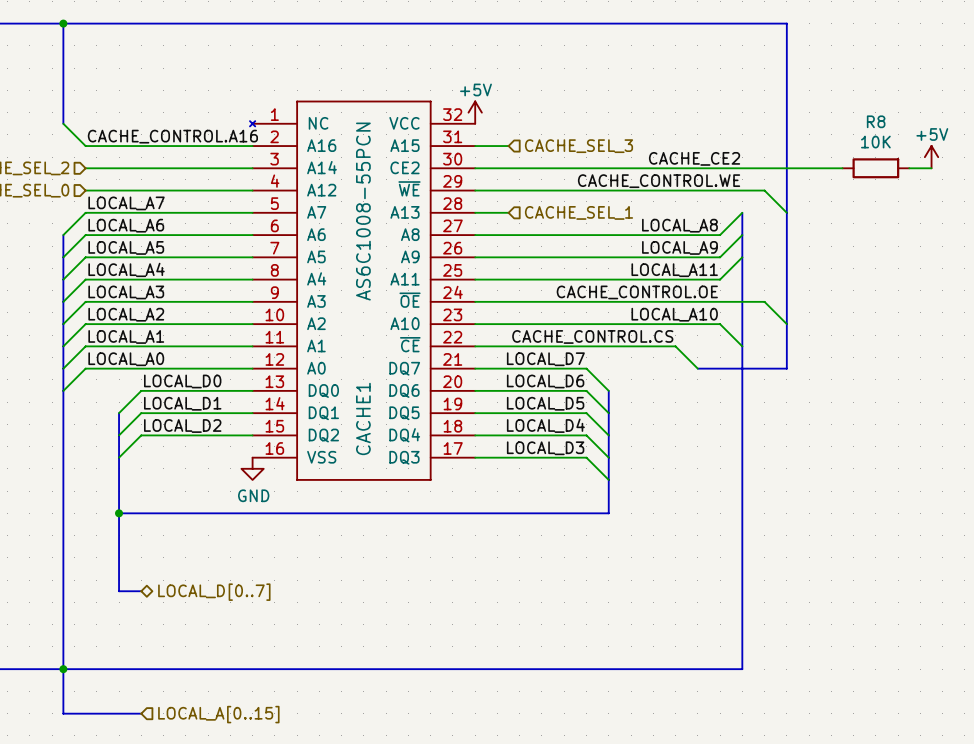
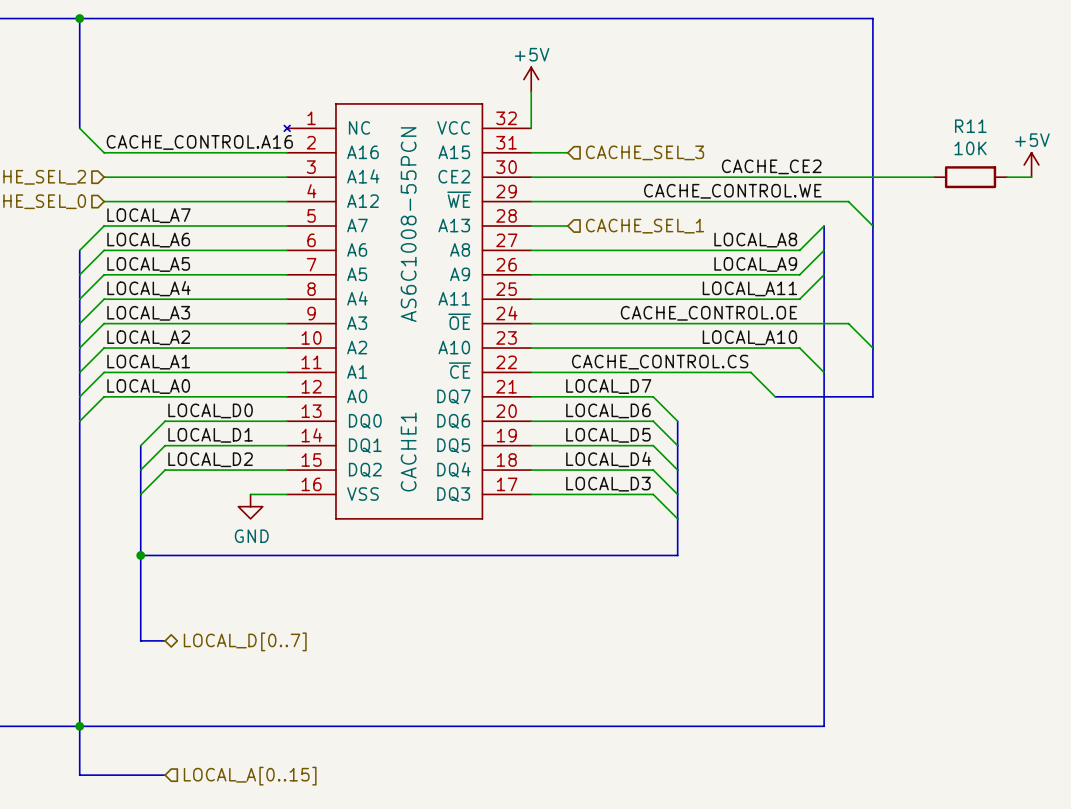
power symbol position: +5V (475, 112) -> +5V (531, 79)
R8 name: R8 (876, 121) -> R11 (970, 126)
wire: none -> (250, 494) (287, 494)
power symbol position: GND (252, 468) -> GND (250, 506)

